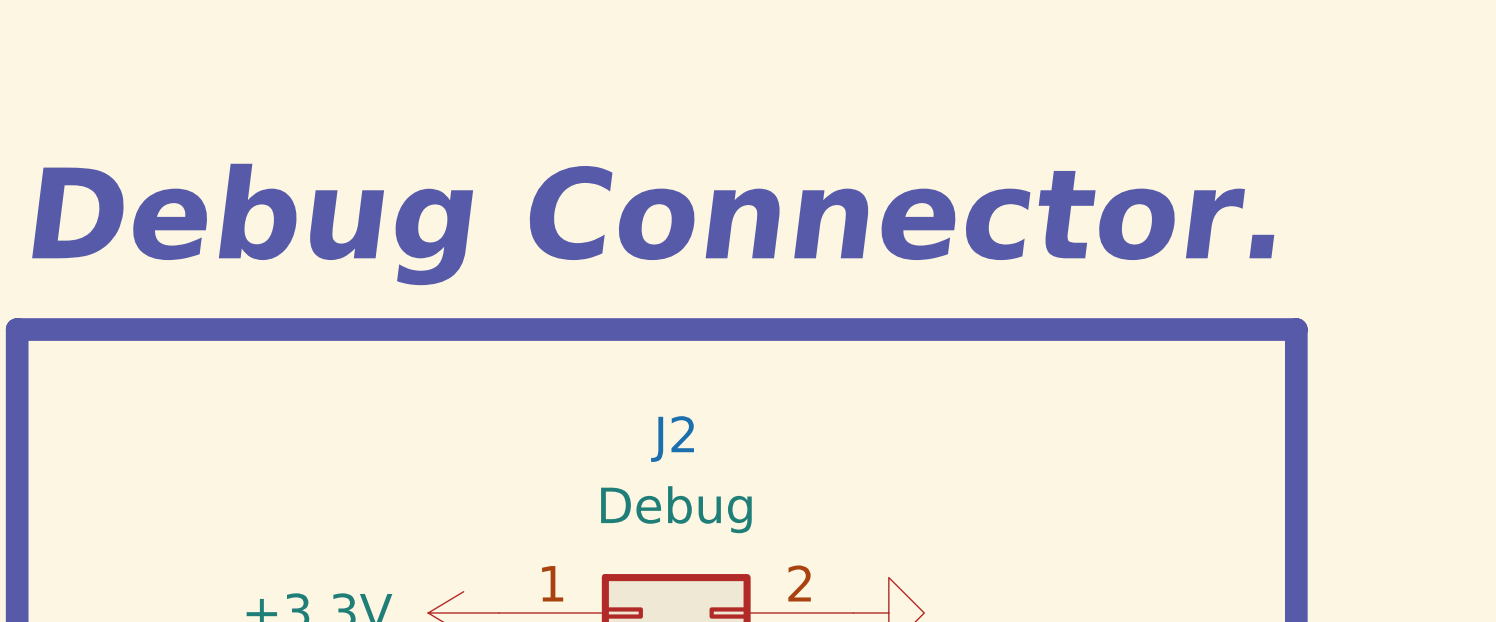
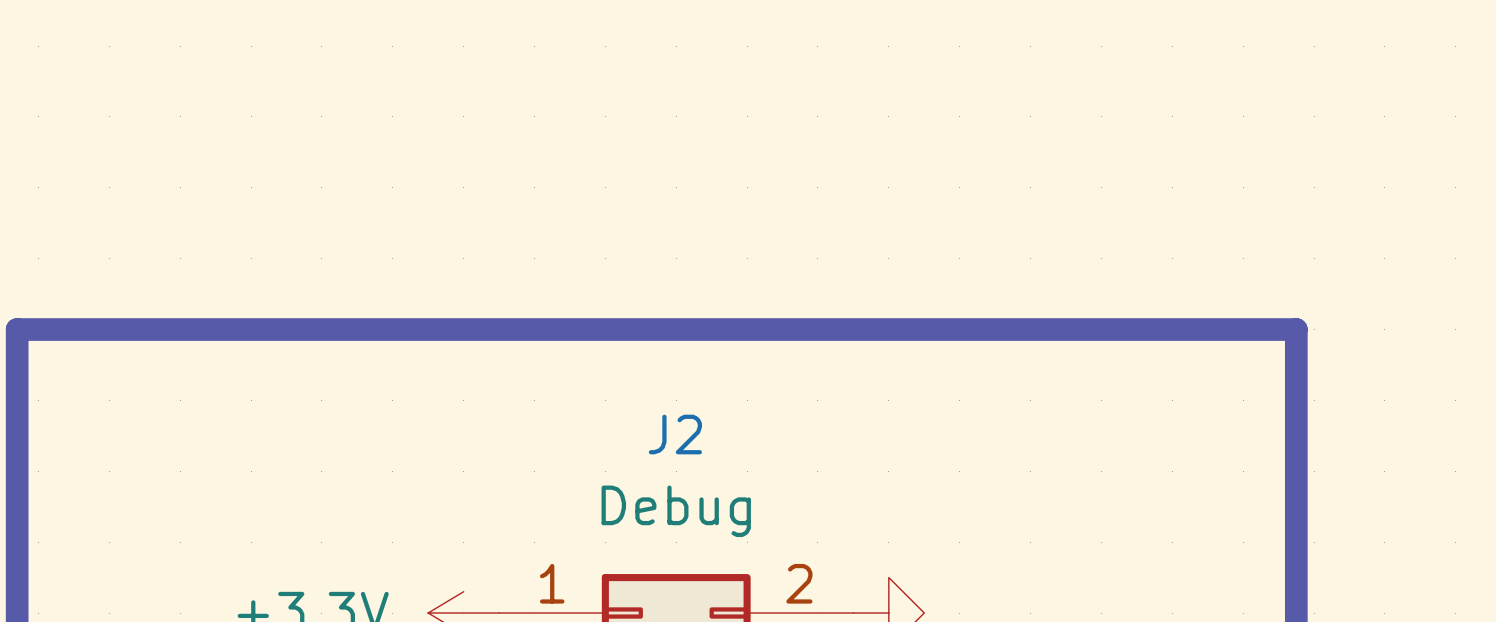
text: Debug Connector. (653, 224) -> none

